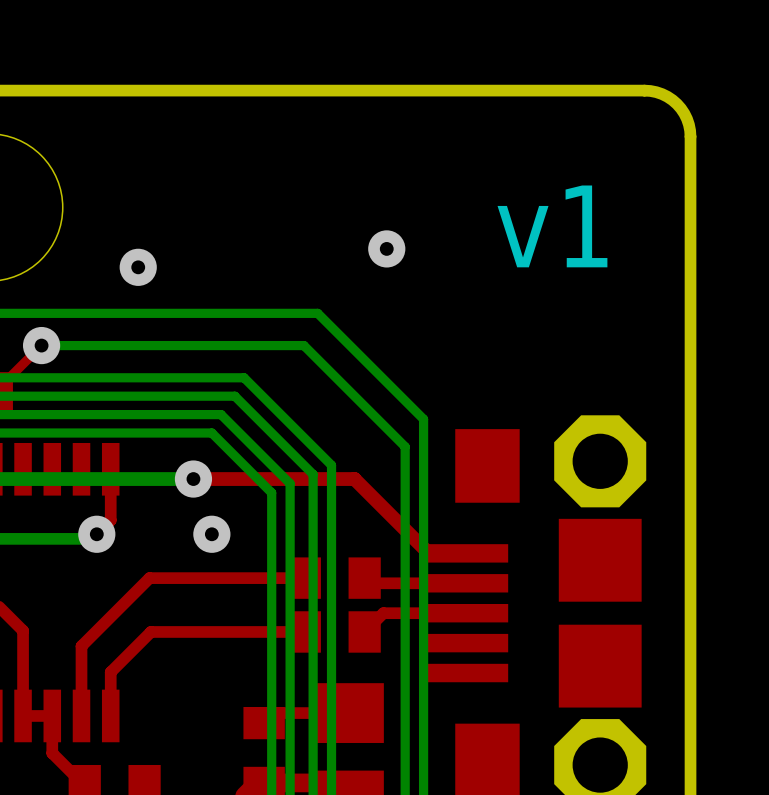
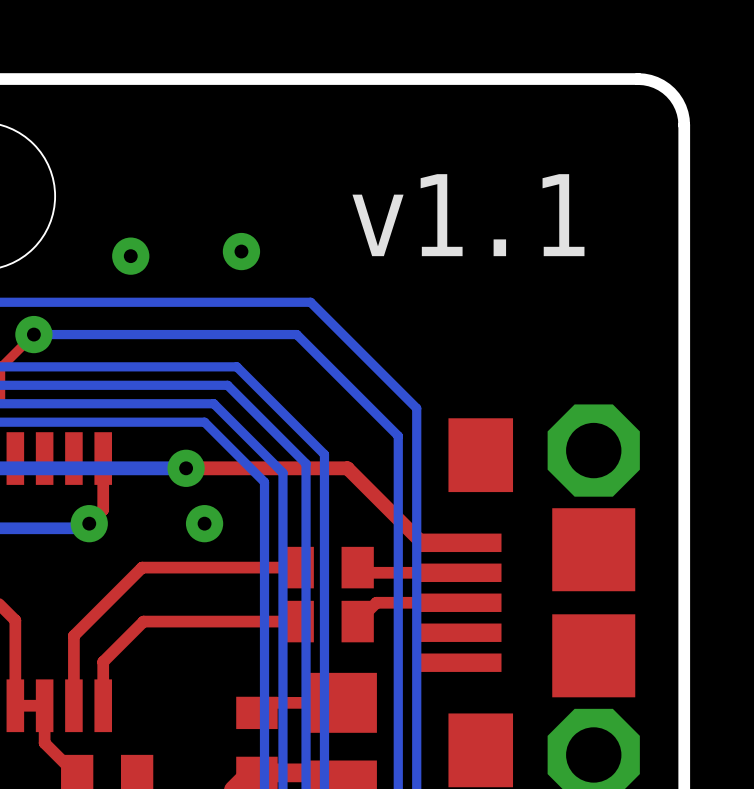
text: v1 (552, 226) -> v1.1 (468, 215)
via position: (386, 248) -> (241, 251)

